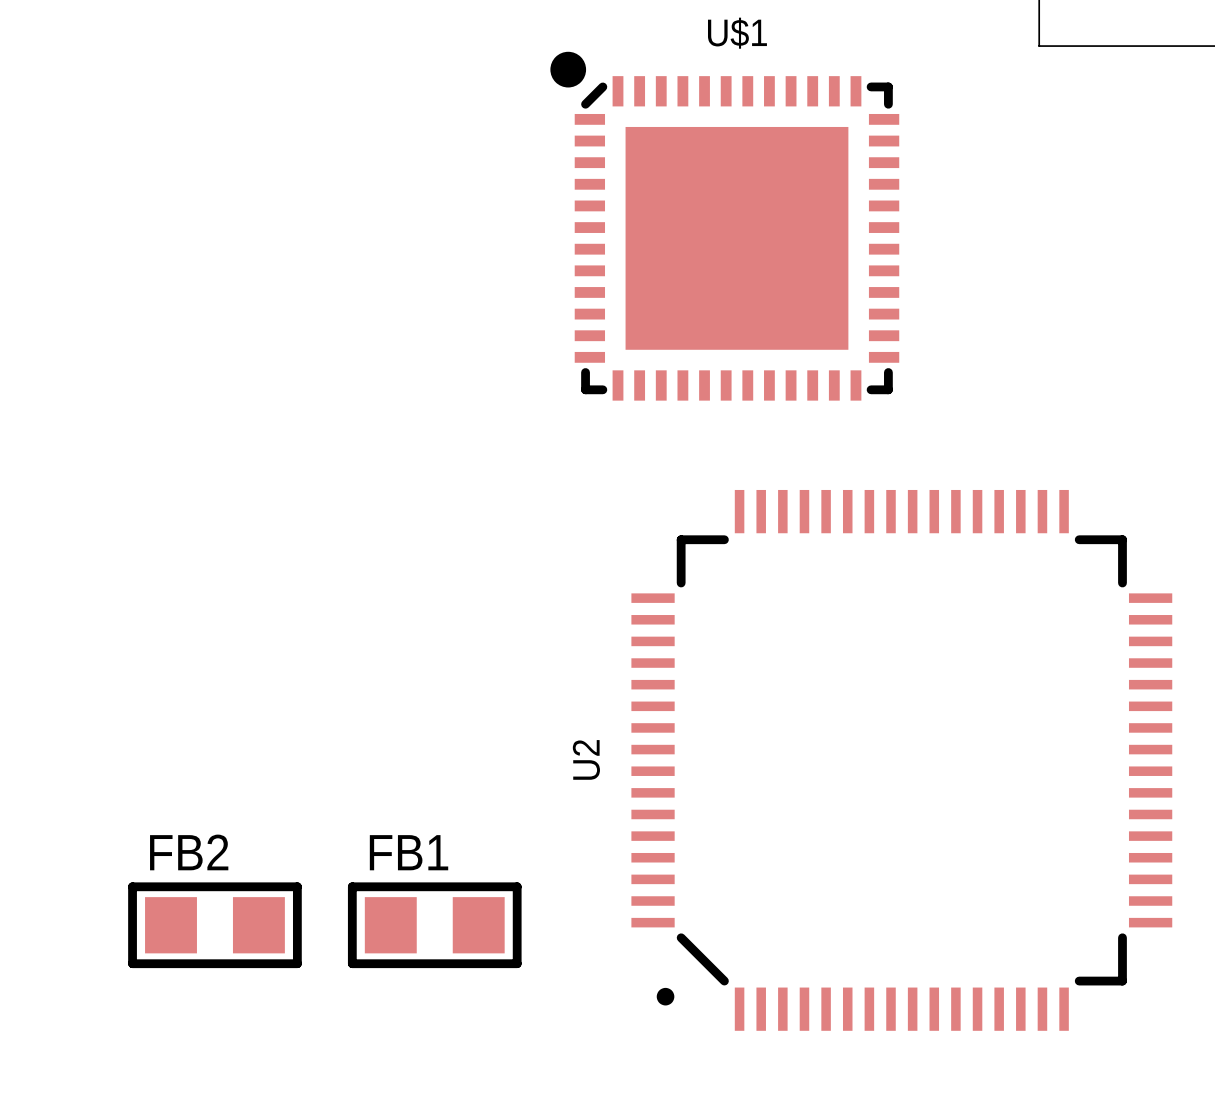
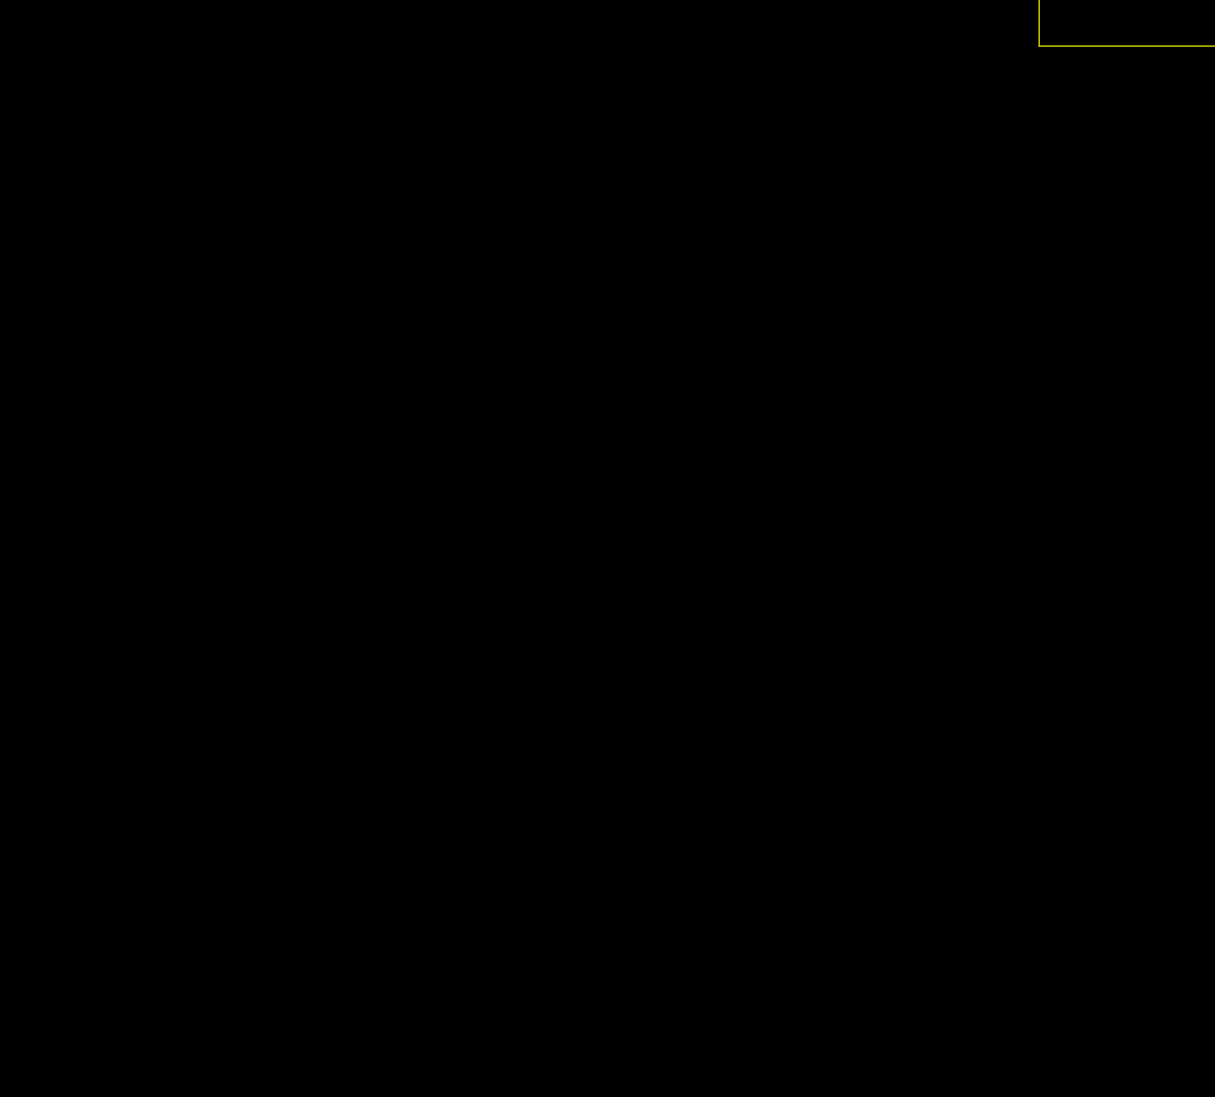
U$1: (724, 226) -> none
U2: (901, 760) -> none
FB2: (214, 925) -> none
FB1: (434, 925) -> none

